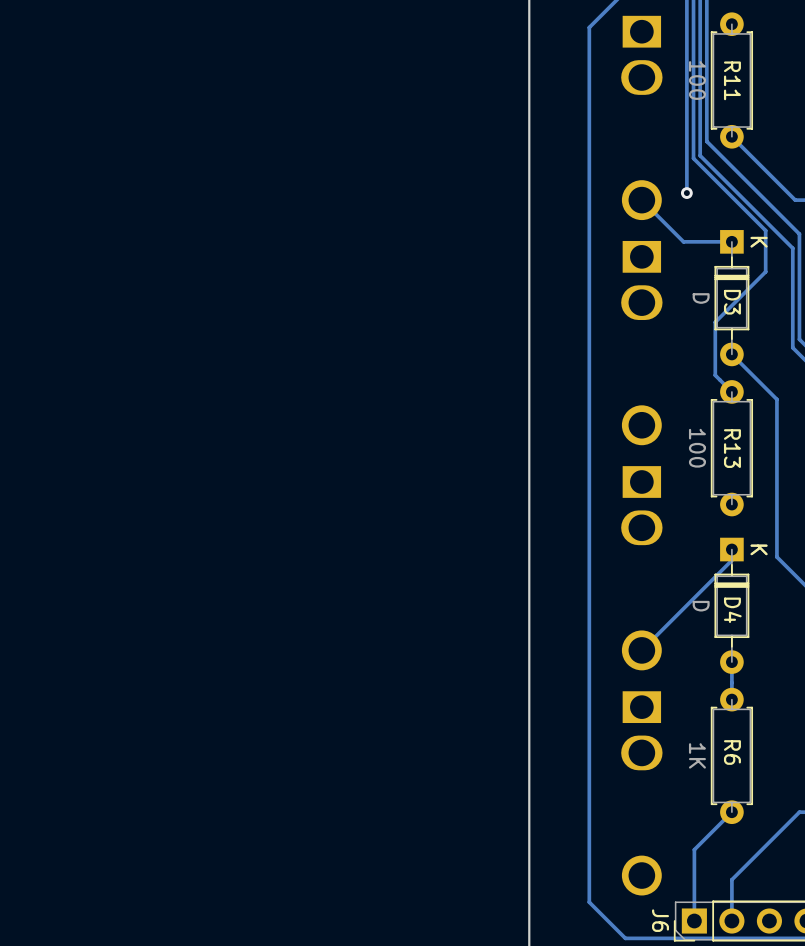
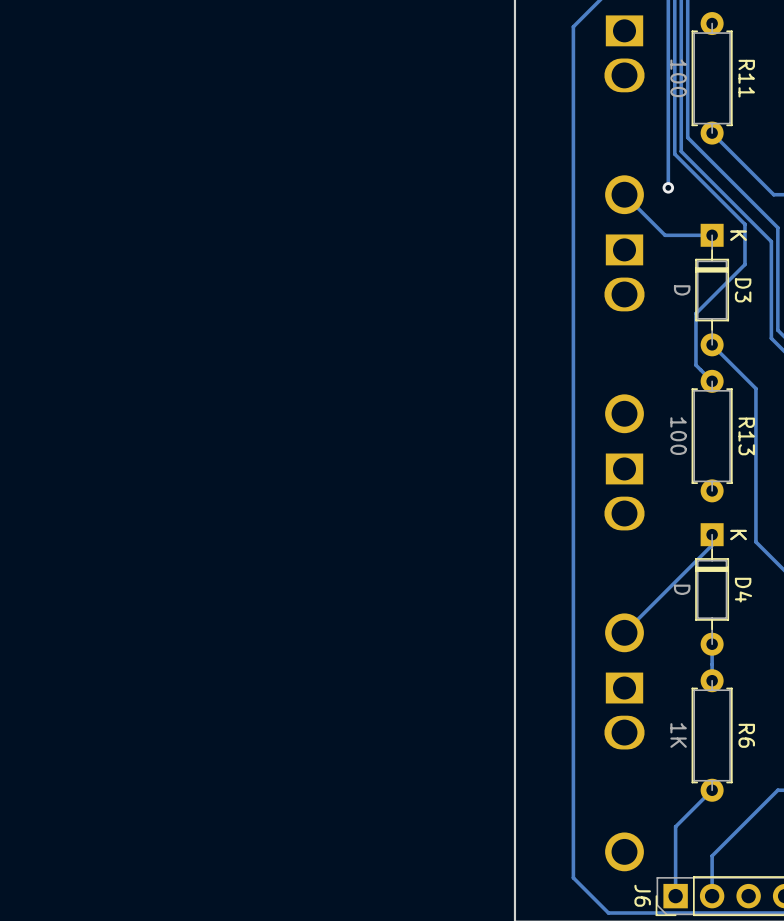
R11 name position: R11 (732, 80) -> R11 (746, 78)
D3 name position: D3 (732, 302) -> D3 (743, 290)
R13 name position: R13 (732, 448) -> R13 (746, 436)
D4 name position: D4 (732, 610) -> D4 (743, 590)
R6 name position: R6 (732, 752) -> R6 (746, 735)

